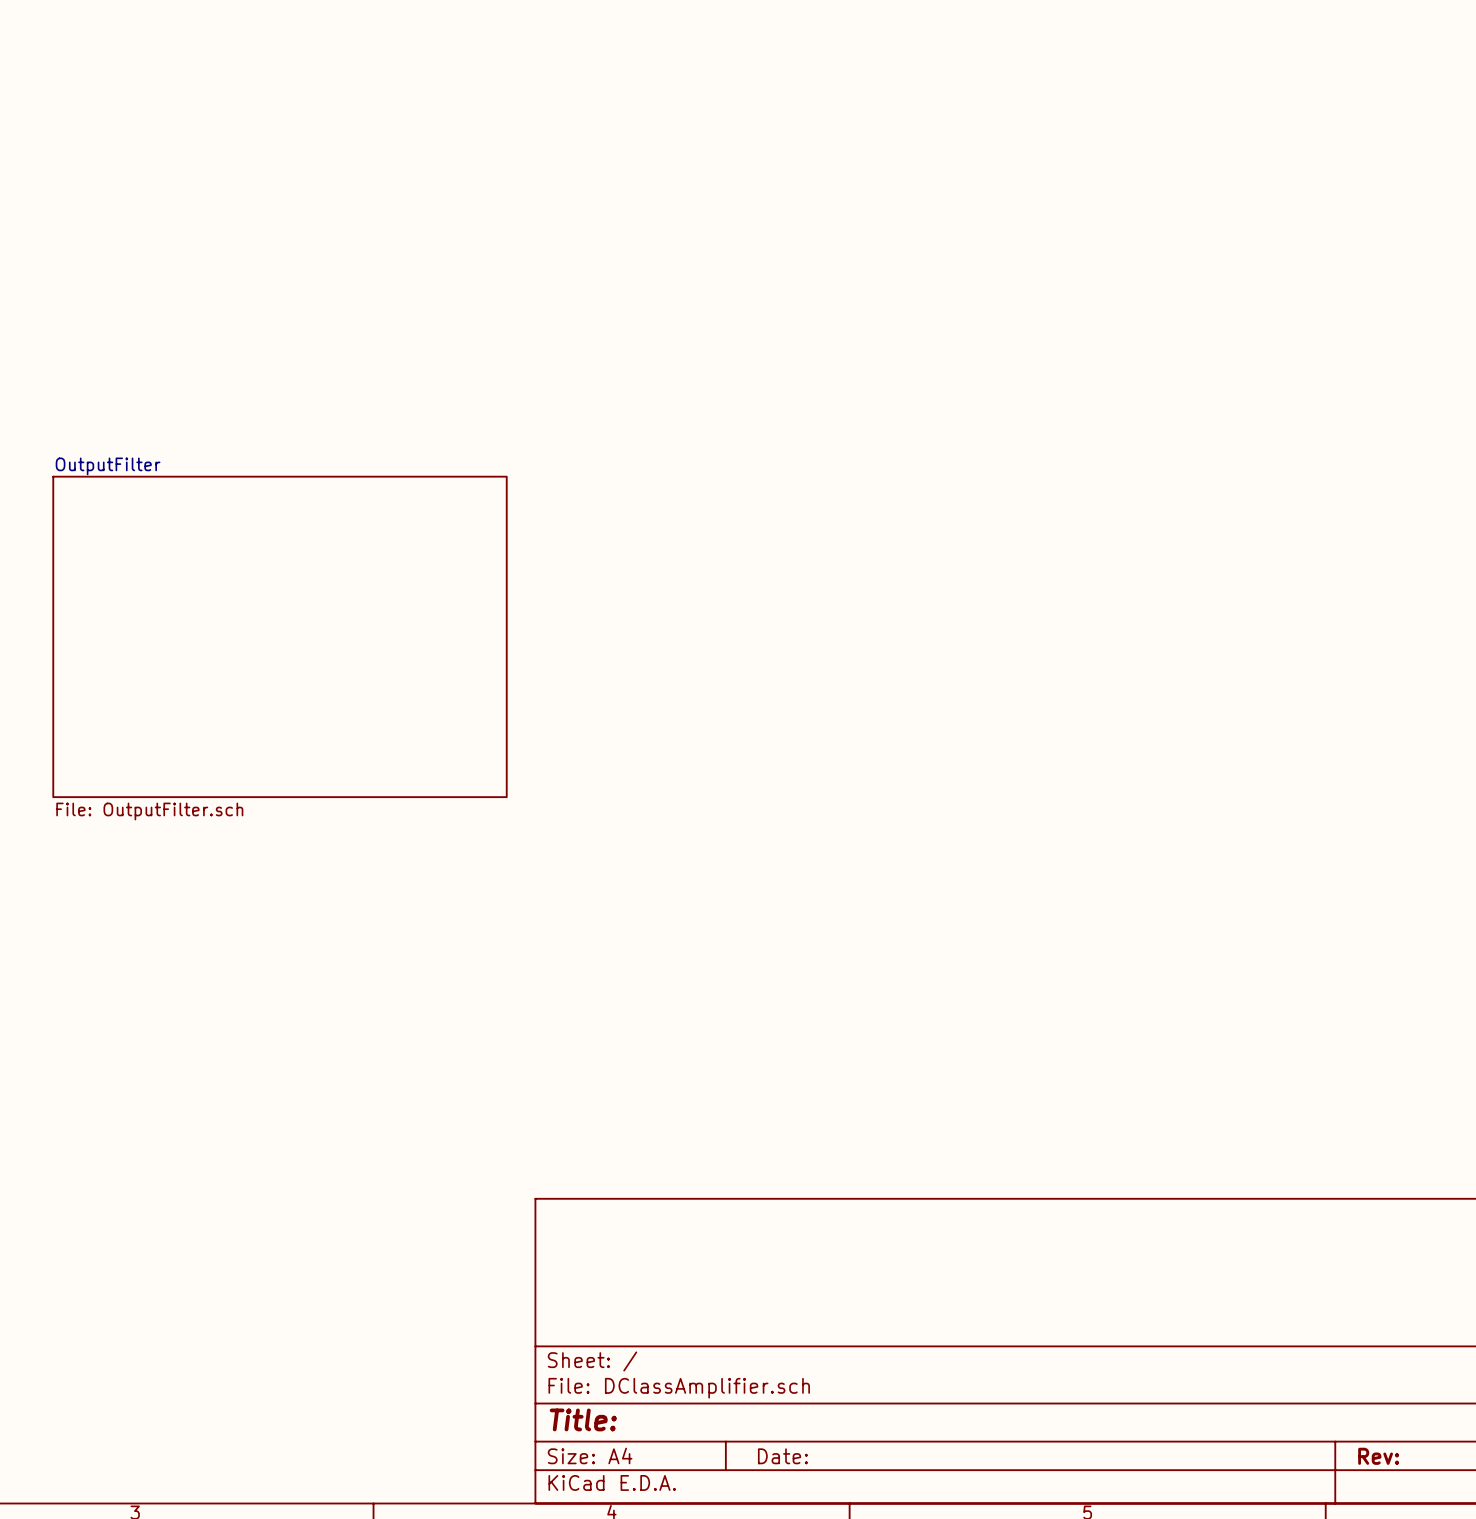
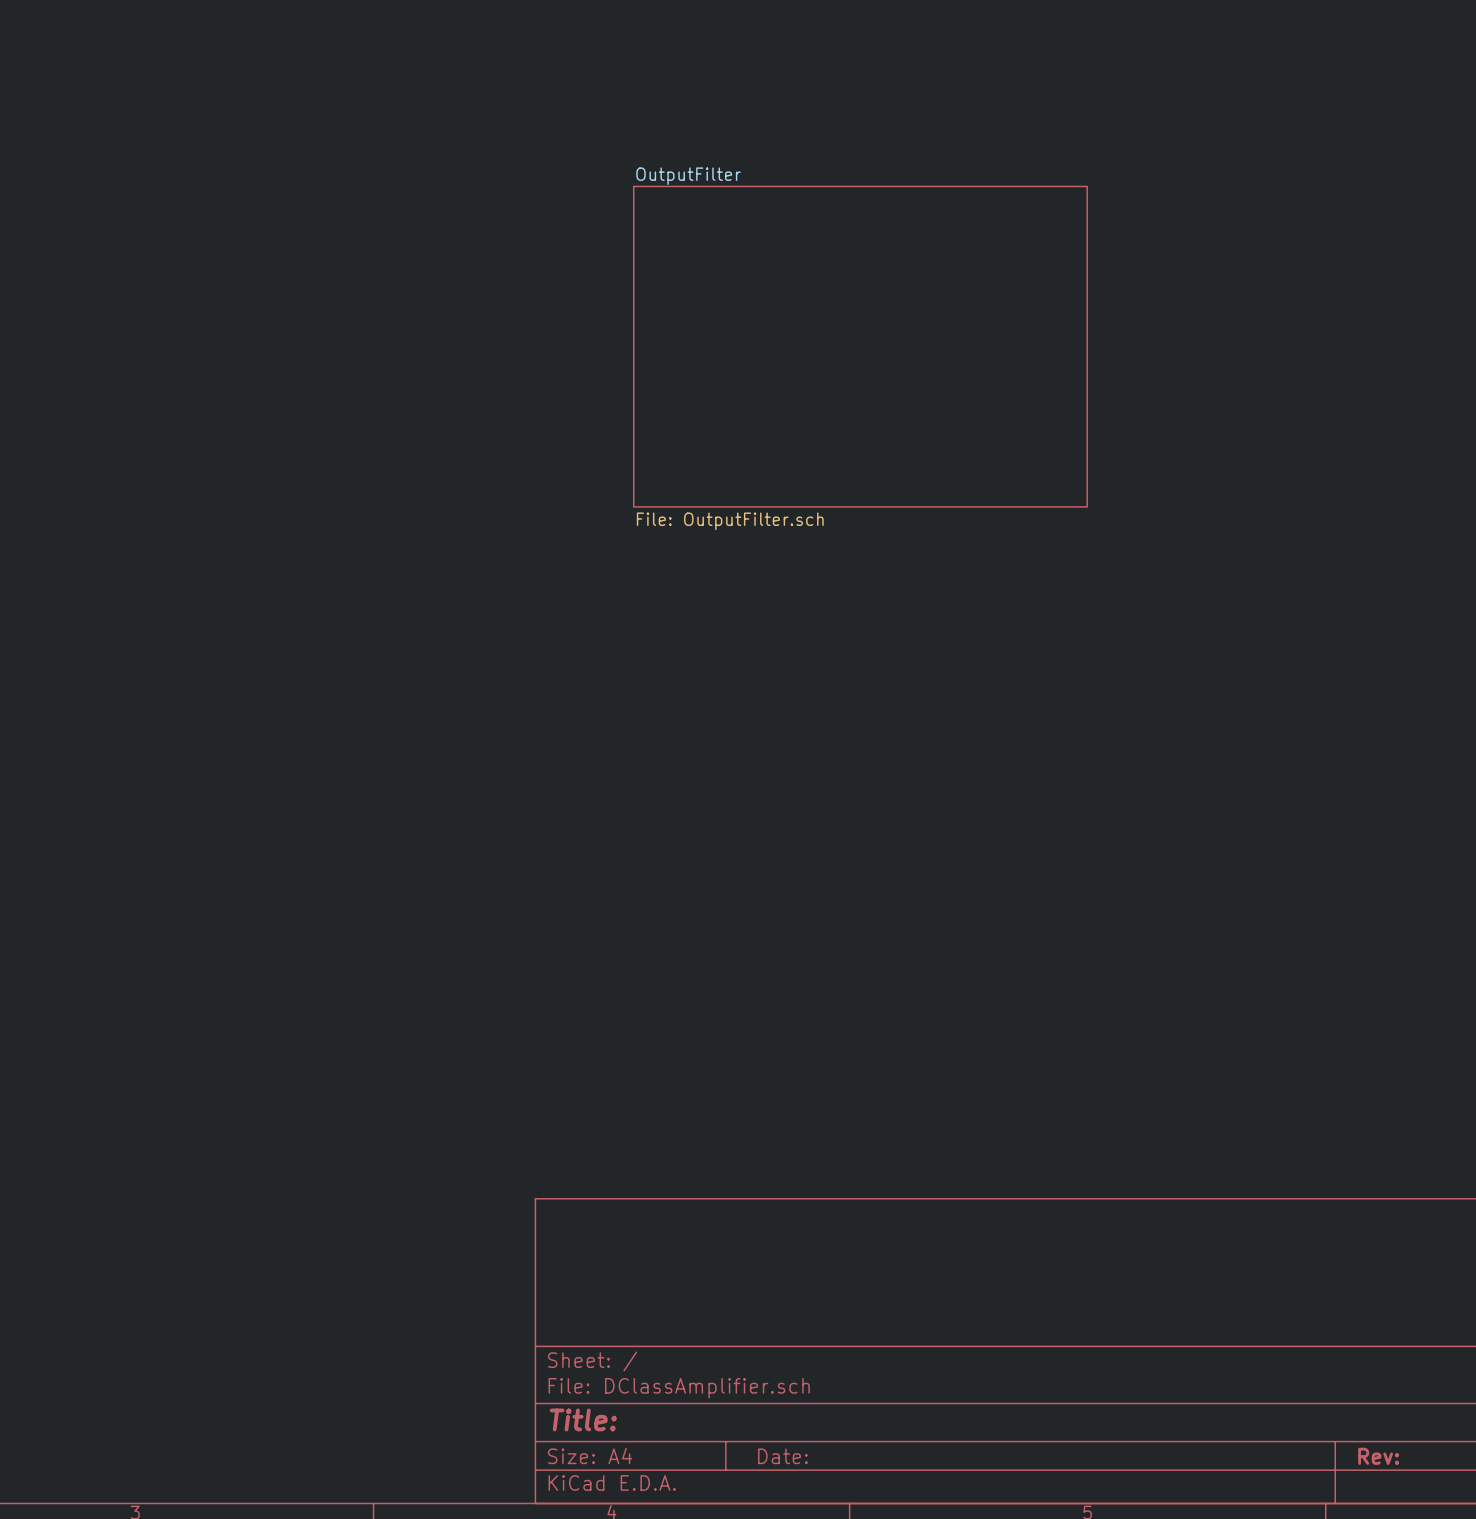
sheet OutputFilter: none -> File: OutputFilter.sch (860, 346)
sheet OutputFilter: File: OutputFilter.sch (280, 636) -> none

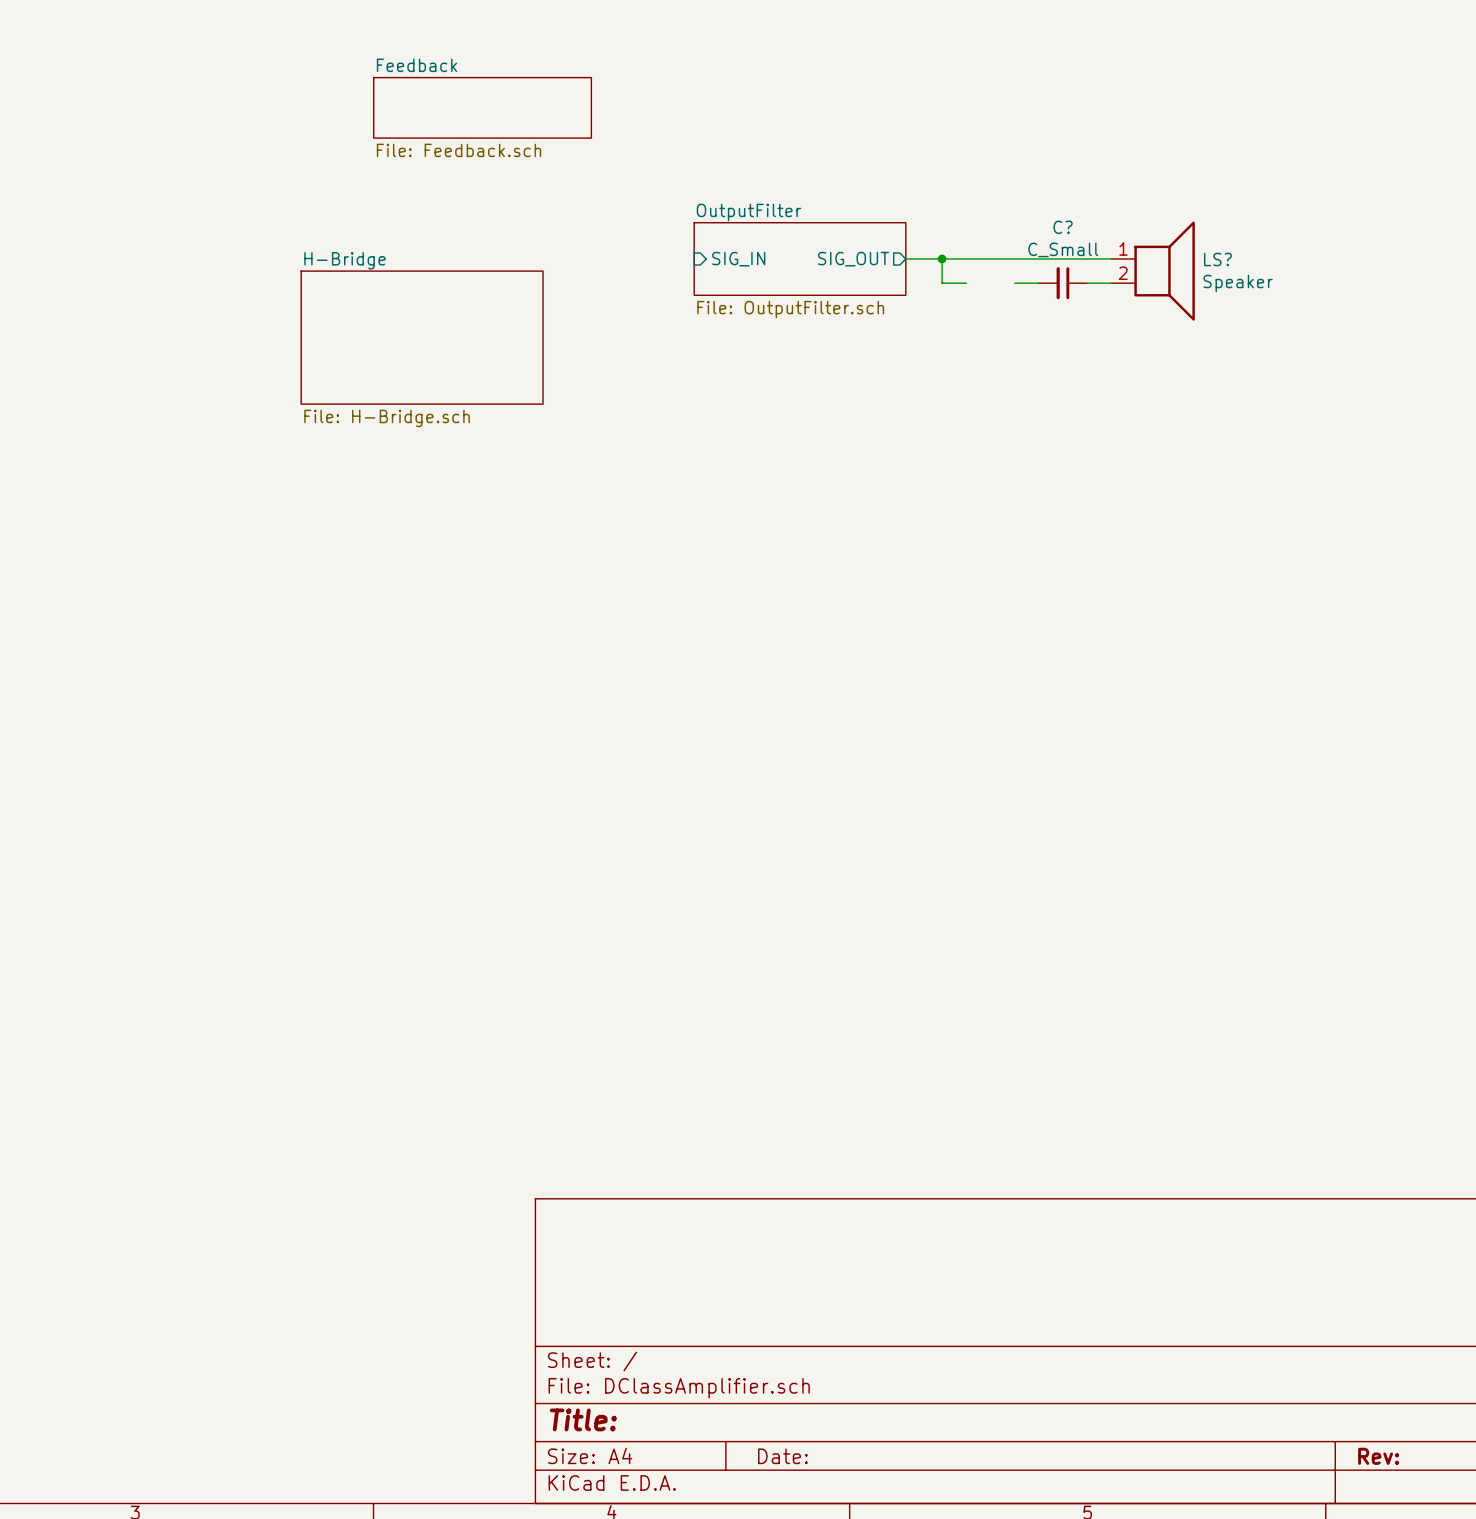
sheet Feedback: none -> File: Feedback.sch (482, 107)
sheet pin: none -> SIG_IN (738, 259)
sheet OutputFilter: none -> File: OutputFilter.sch (799, 259)
sheet pin: none -> SIG_OUT (853, 259)
wire: none -> (905, 259) (1111, 259)
wire: none -> (942, 259) (942, 283) (966, 283)
junction: none -> (942, 259)
LS?: none -> Speaker (1153, 271)
wire: none -> (1014, 283) (1038, 283)
C?: none -> C_Small (1063, 283)
wire: none -> (1087, 283) (1111, 283)
sheet H-Bridge: none -> File: H-Bridge.sch (422, 337)
sheet OutputFilter: File: OutputFilter.sch (860, 346) -> none

